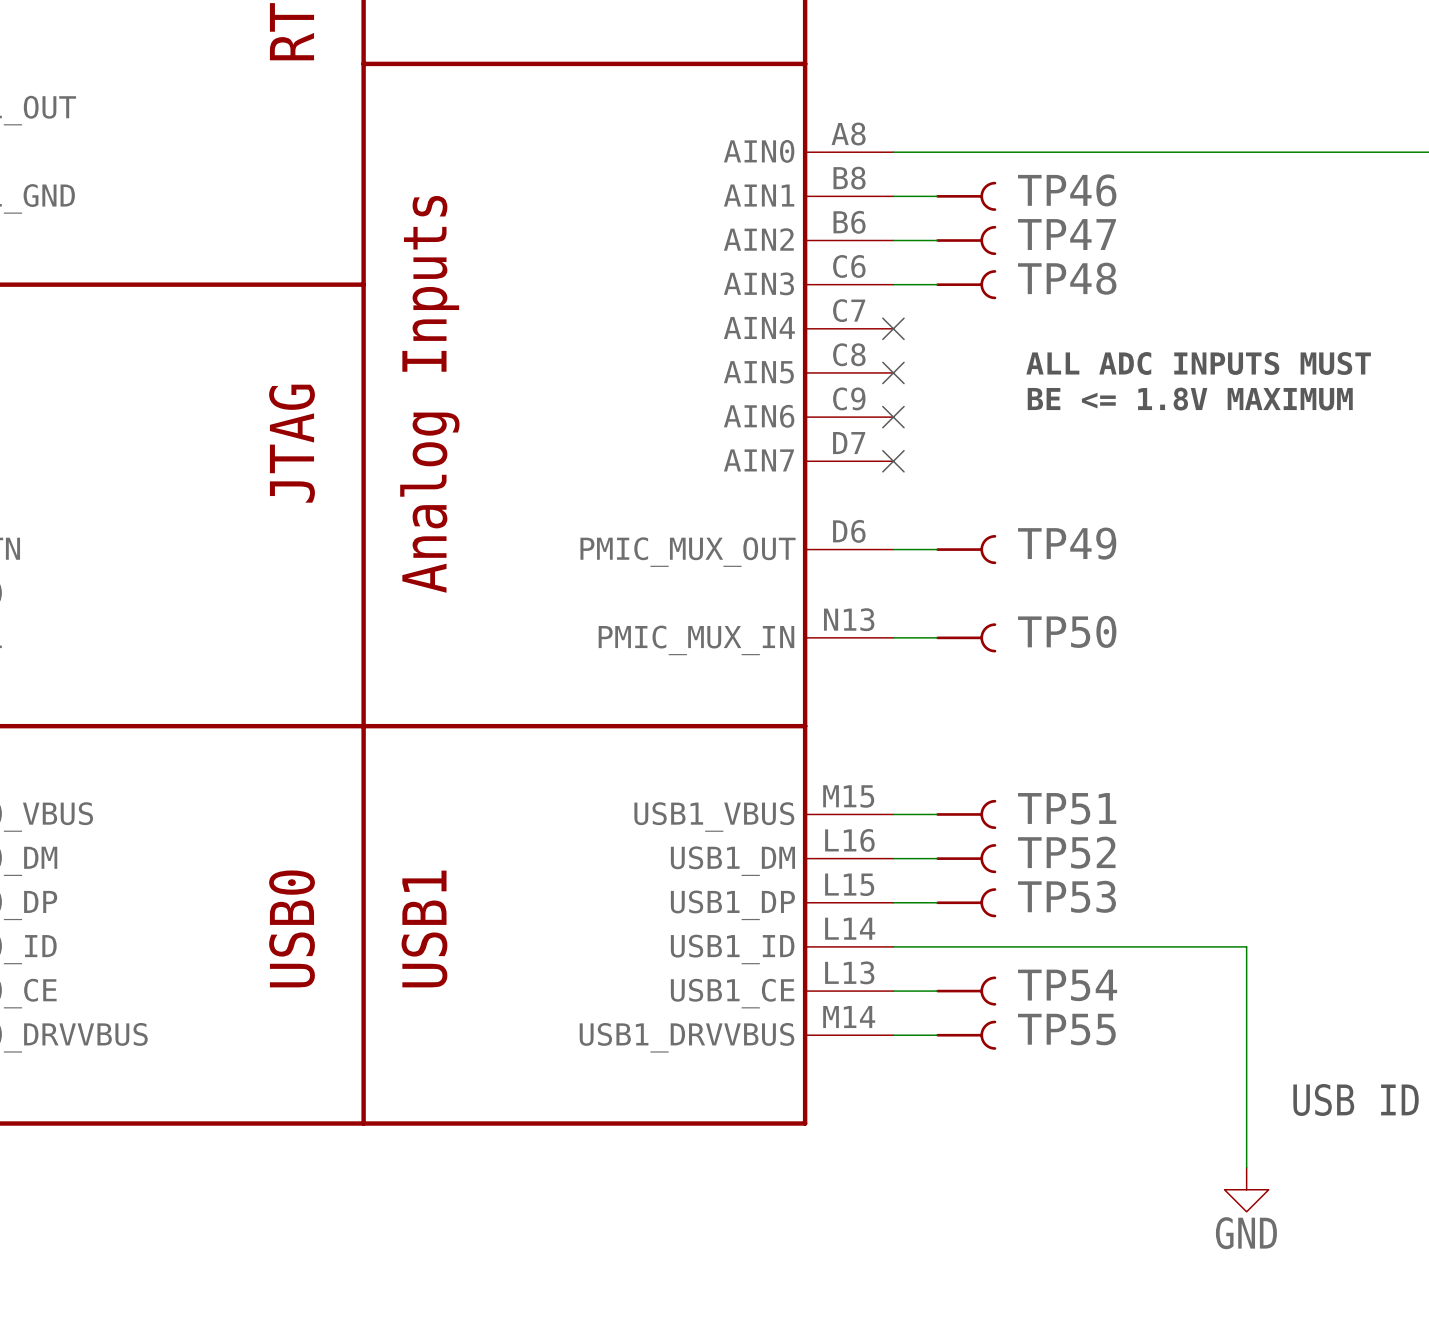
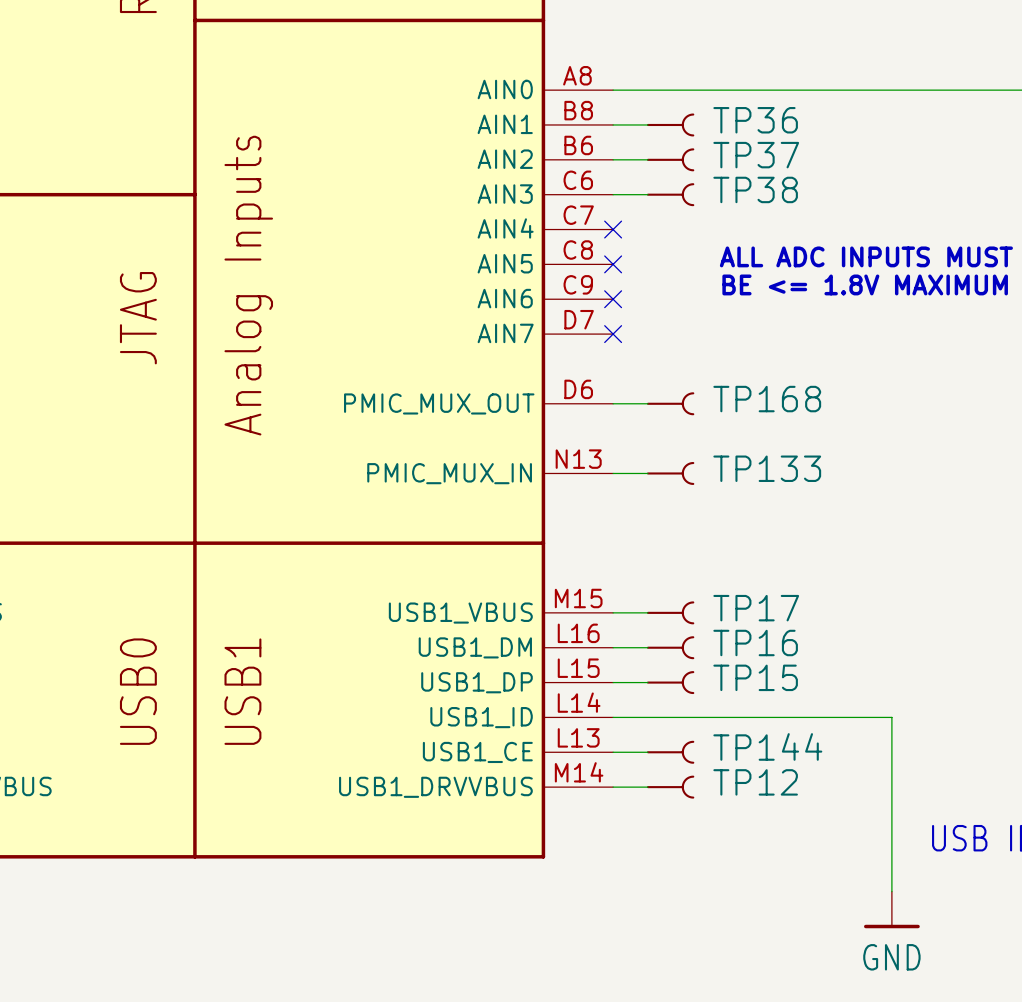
TP46 name: TP46 (1067, 190) -> TP36 (755, 120)
TP47 name: TP47 (1066, 234) -> TP37 (756, 155)
TP48 name: TP48 (1067, 278) -> TP38 (755, 189)
TP49 name: TP49 (1067, 543) -> TP168 (767, 399)
TP50 name: TP50 (1067, 631) -> TP133 (767, 468)
TP51 name: TP51 (1067, 808) -> TP17 (756, 608)
TP52 name: TP52 (1066, 852) -> TP16 (755, 642)
TP53 name: TP53 (1066, 896) -> TP15 (755, 677)
TP54 name: TP54 (1067, 985) -> TP144 (767, 746)
TP55 name: TP55 (1066, 1029) -> TP12 (755, 782)
power symbol shape: [1224, 1167, 1269, 1212] -> [864, 891, 920, 929]

